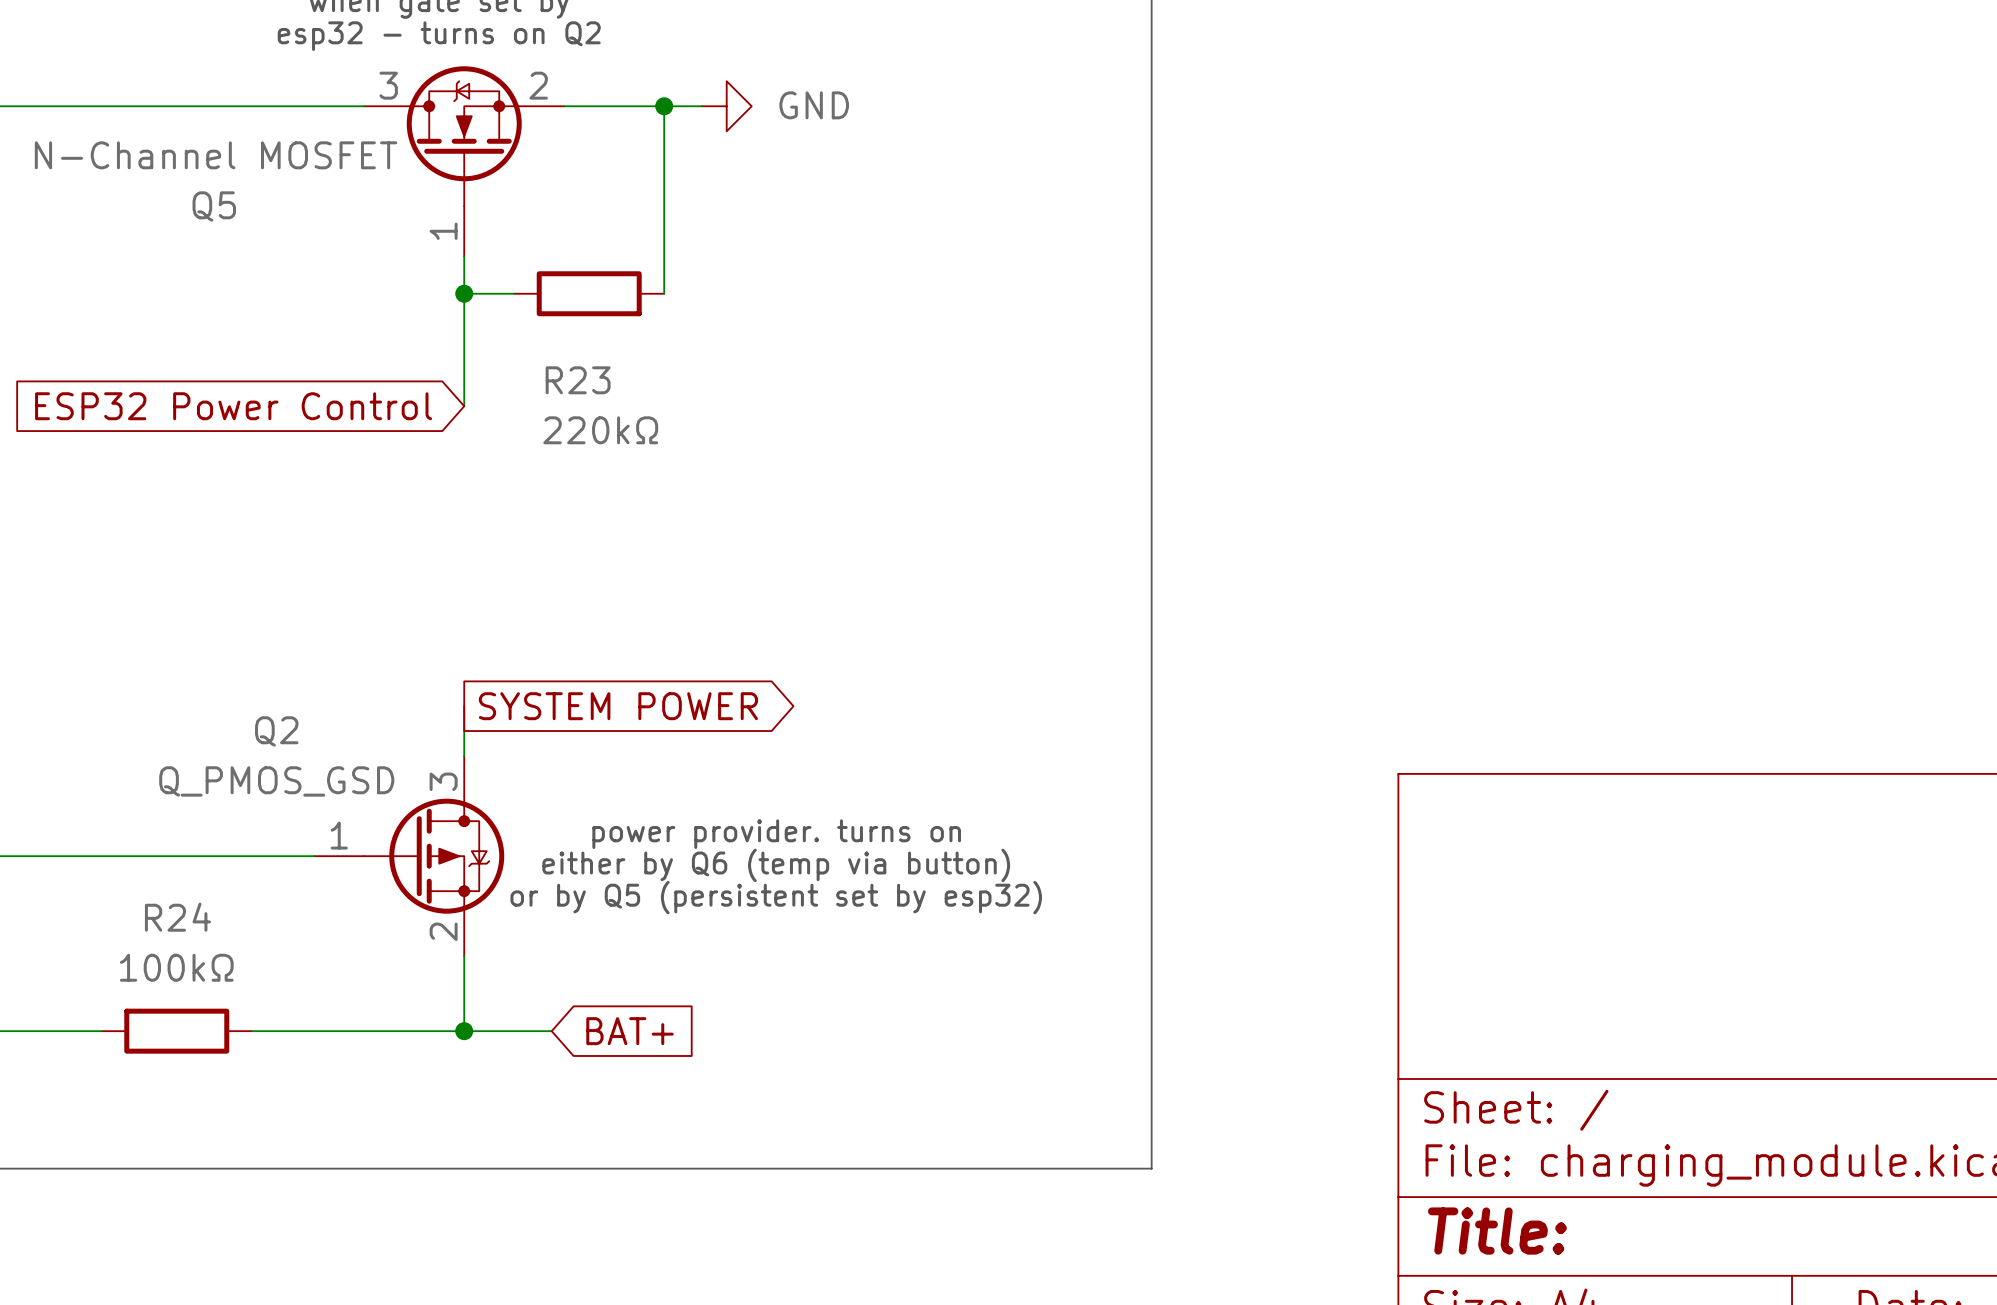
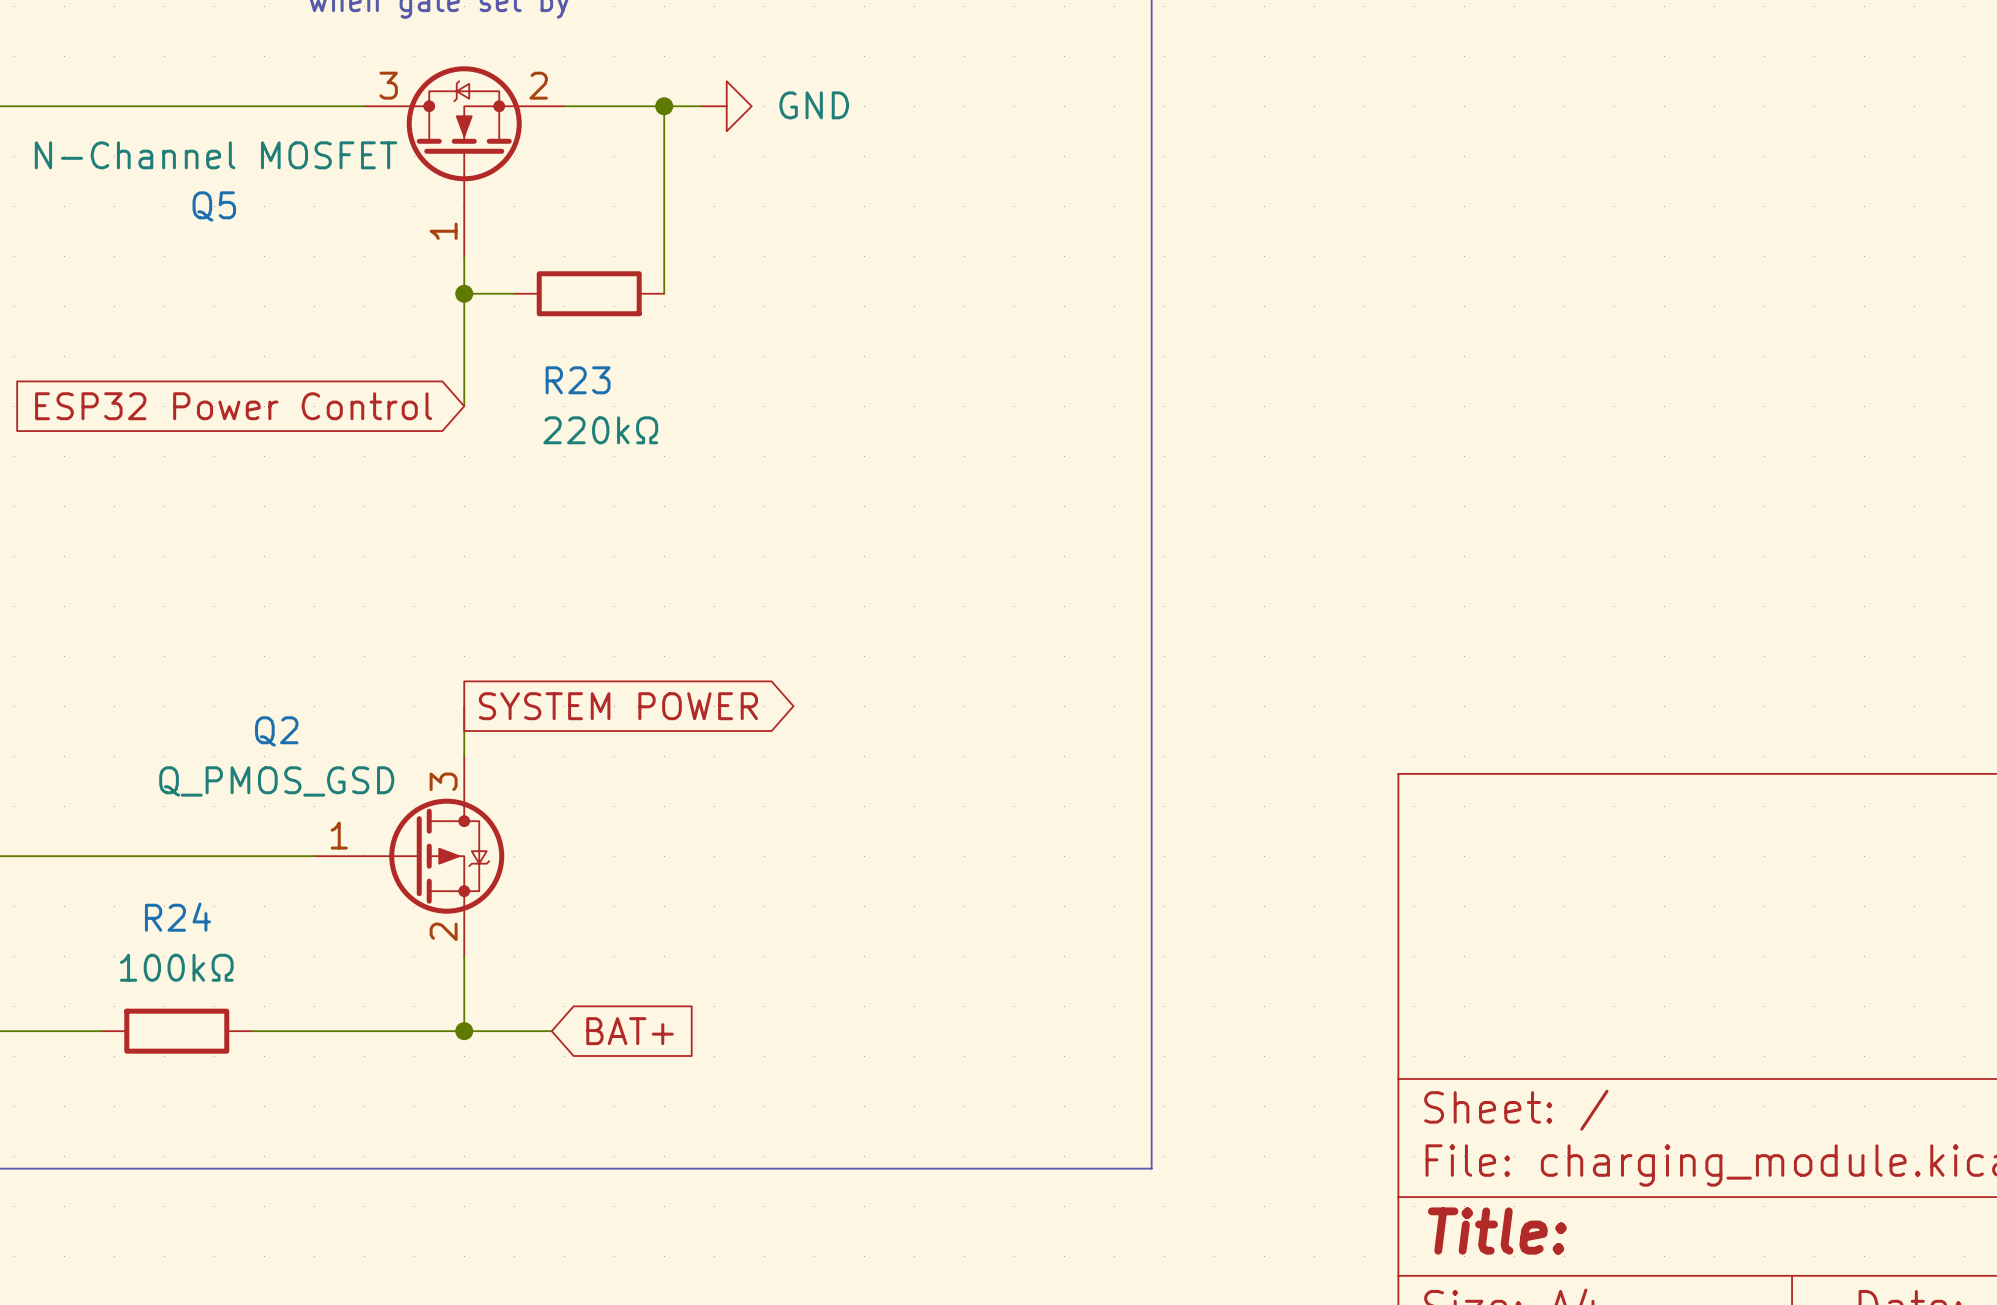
text: esp32 - turns on Q2 (439, 36) -> none
text: power provider. turns on (776, 834) -> none
text: either by Q6 (temp via button) (776, 865) -> none
text: or by Q5 (persistent set by esp32) (776, 897) -> none

